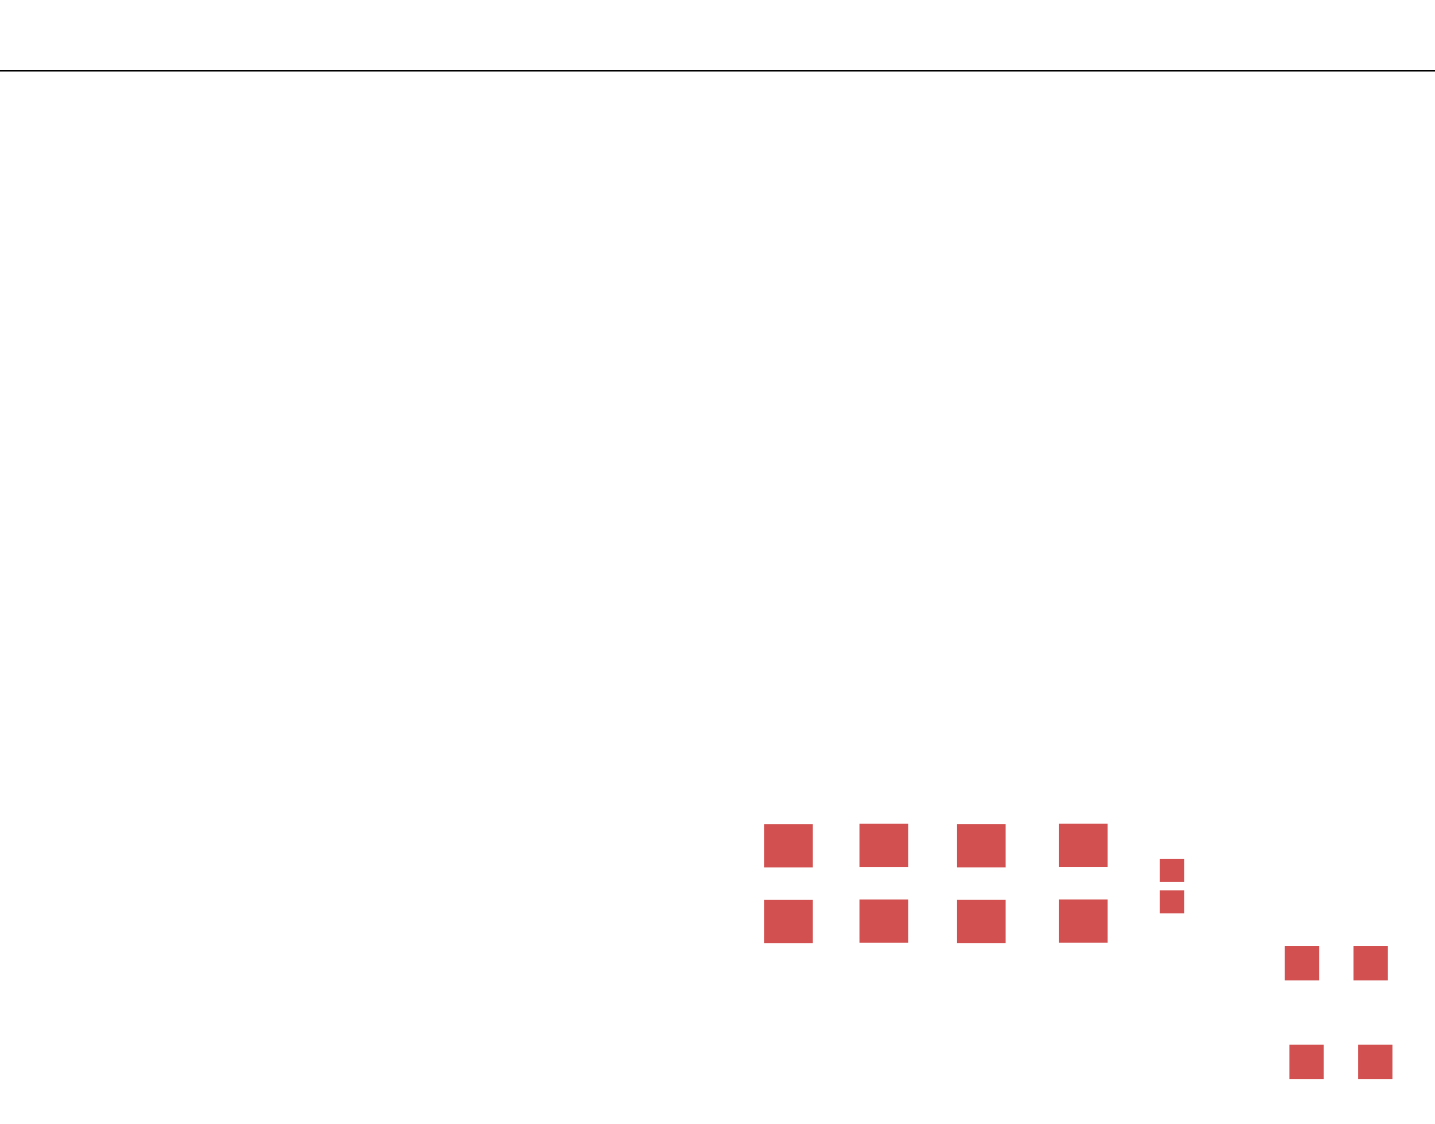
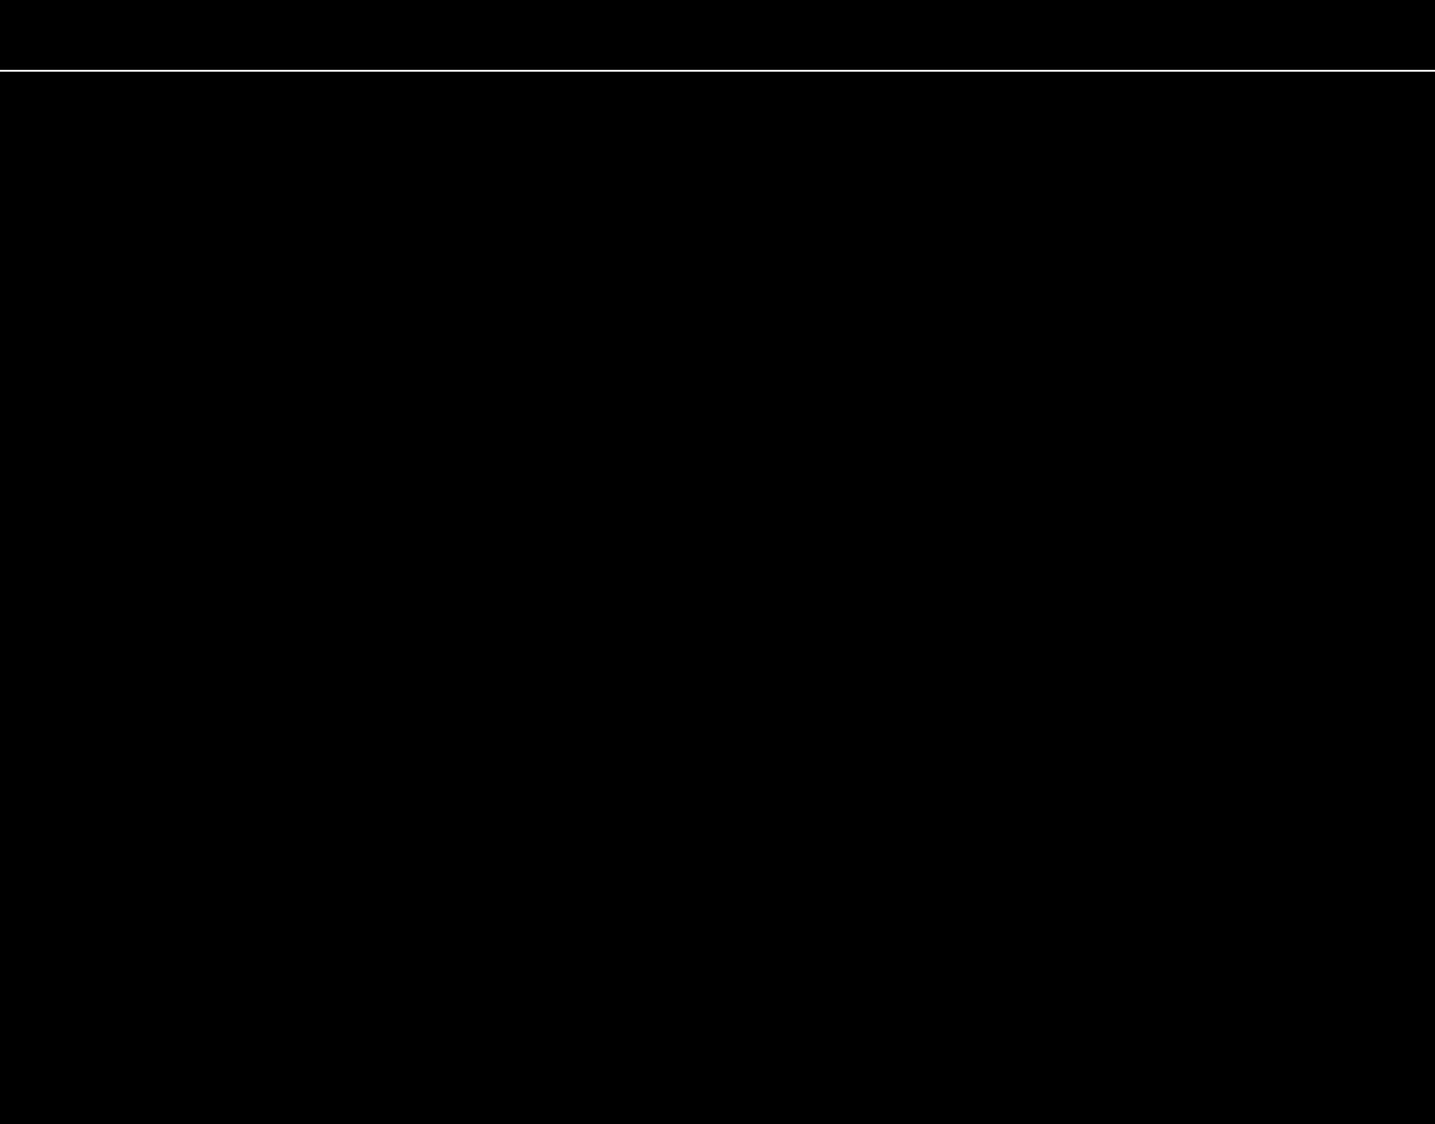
part: (788, 883) -> none
part: (883, 883) -> none
part: (981, 883) -> none
part: (1083, 883) -> none
part: (1171, 886) -> none
part: (1336, 963) -> none
part: (1340, 1061) -> none

